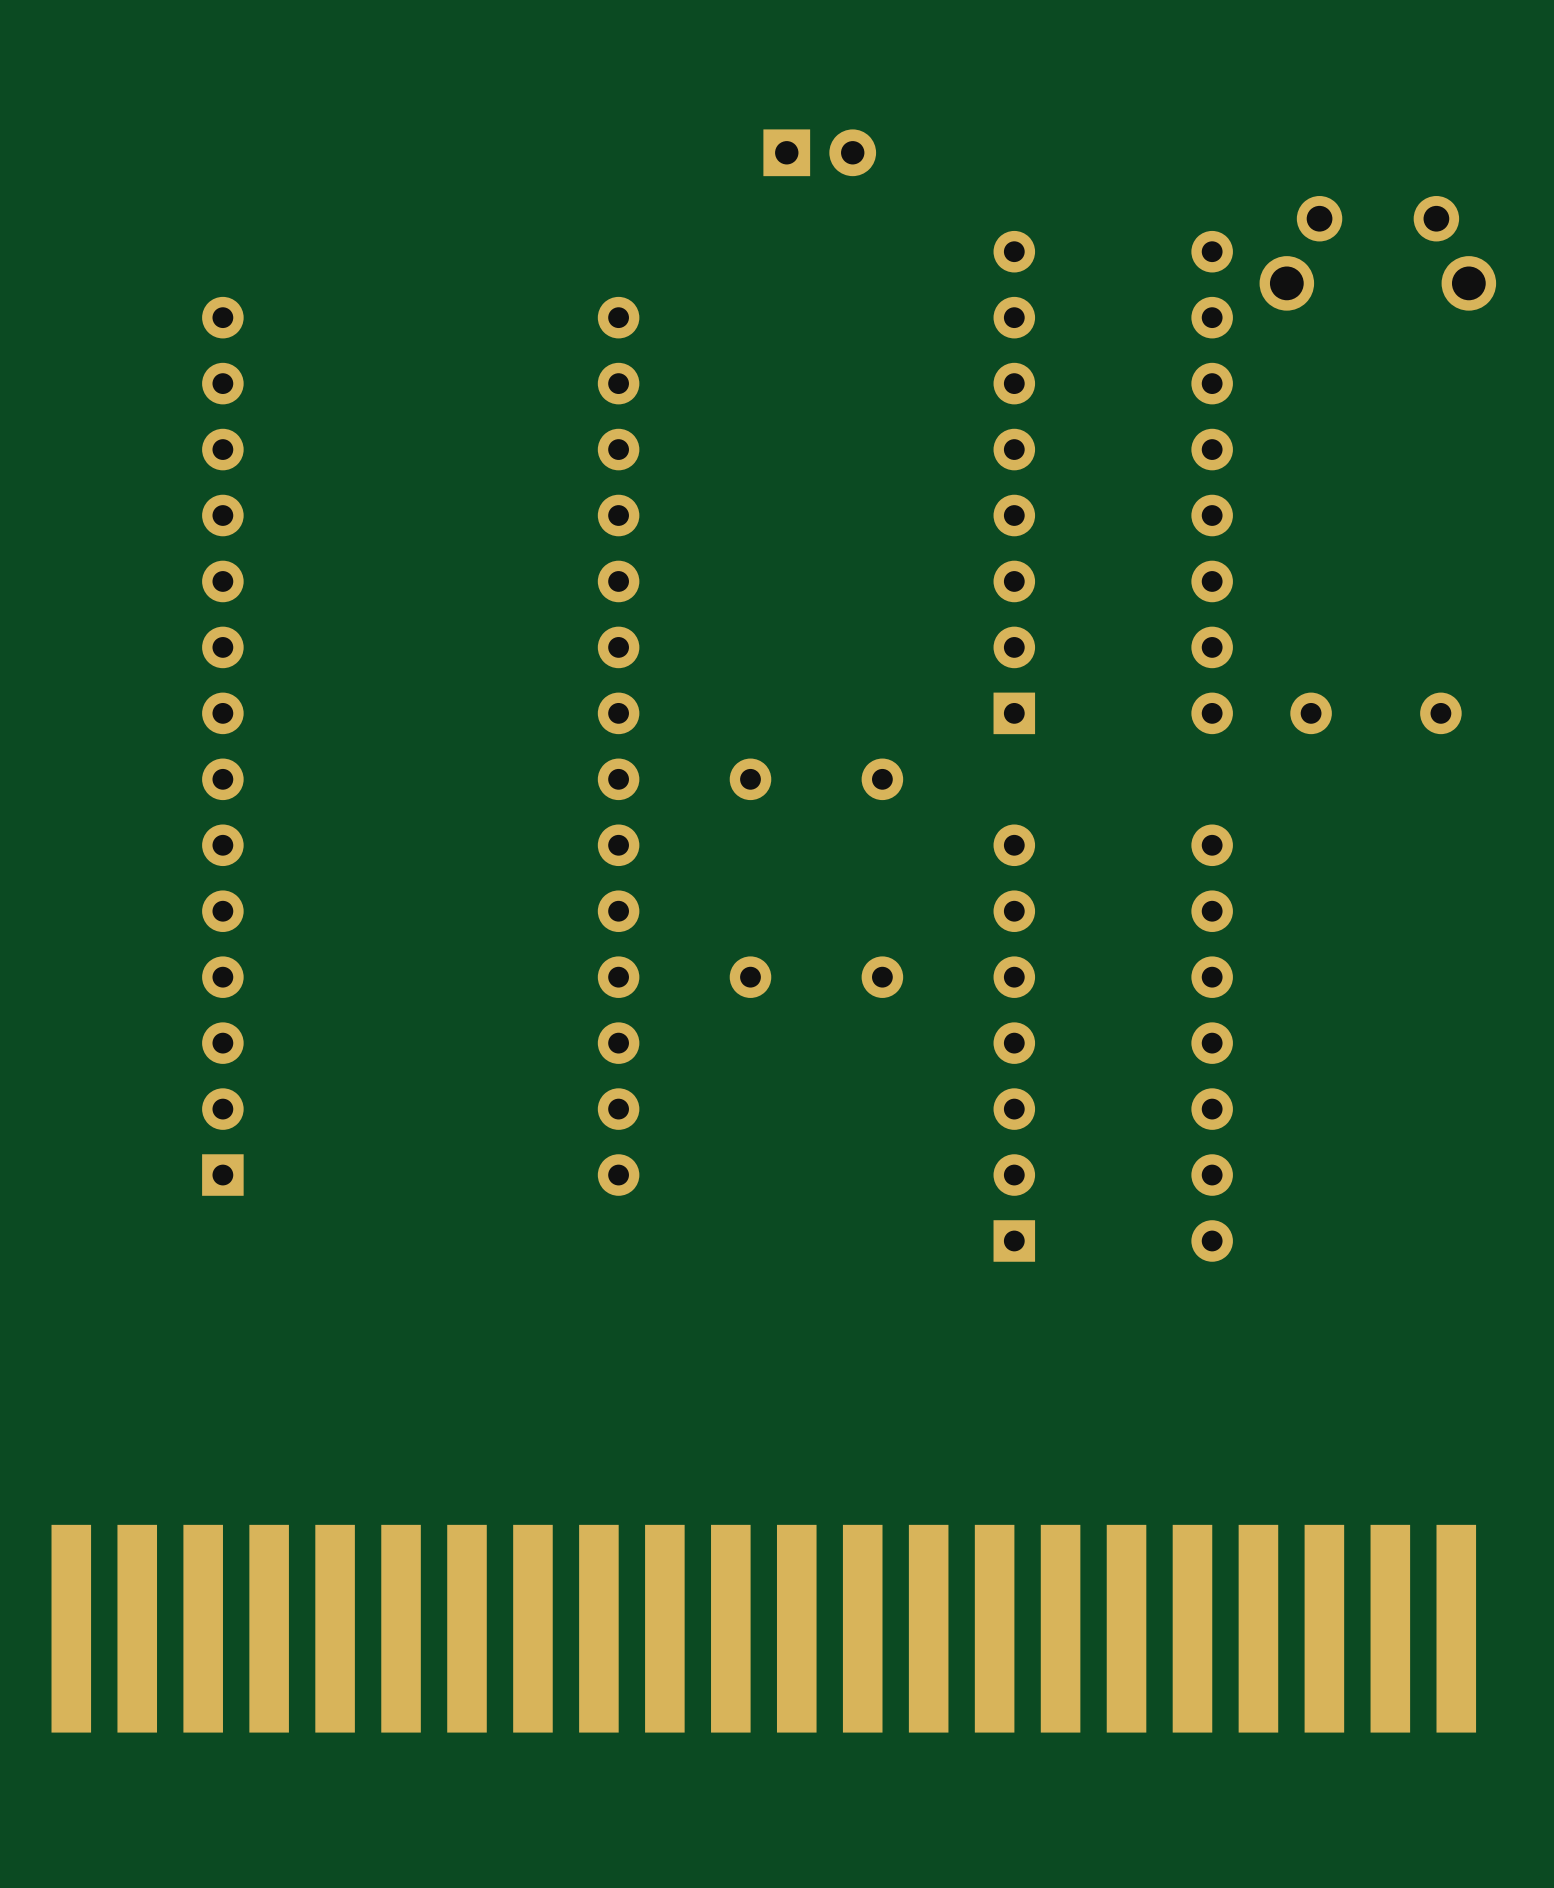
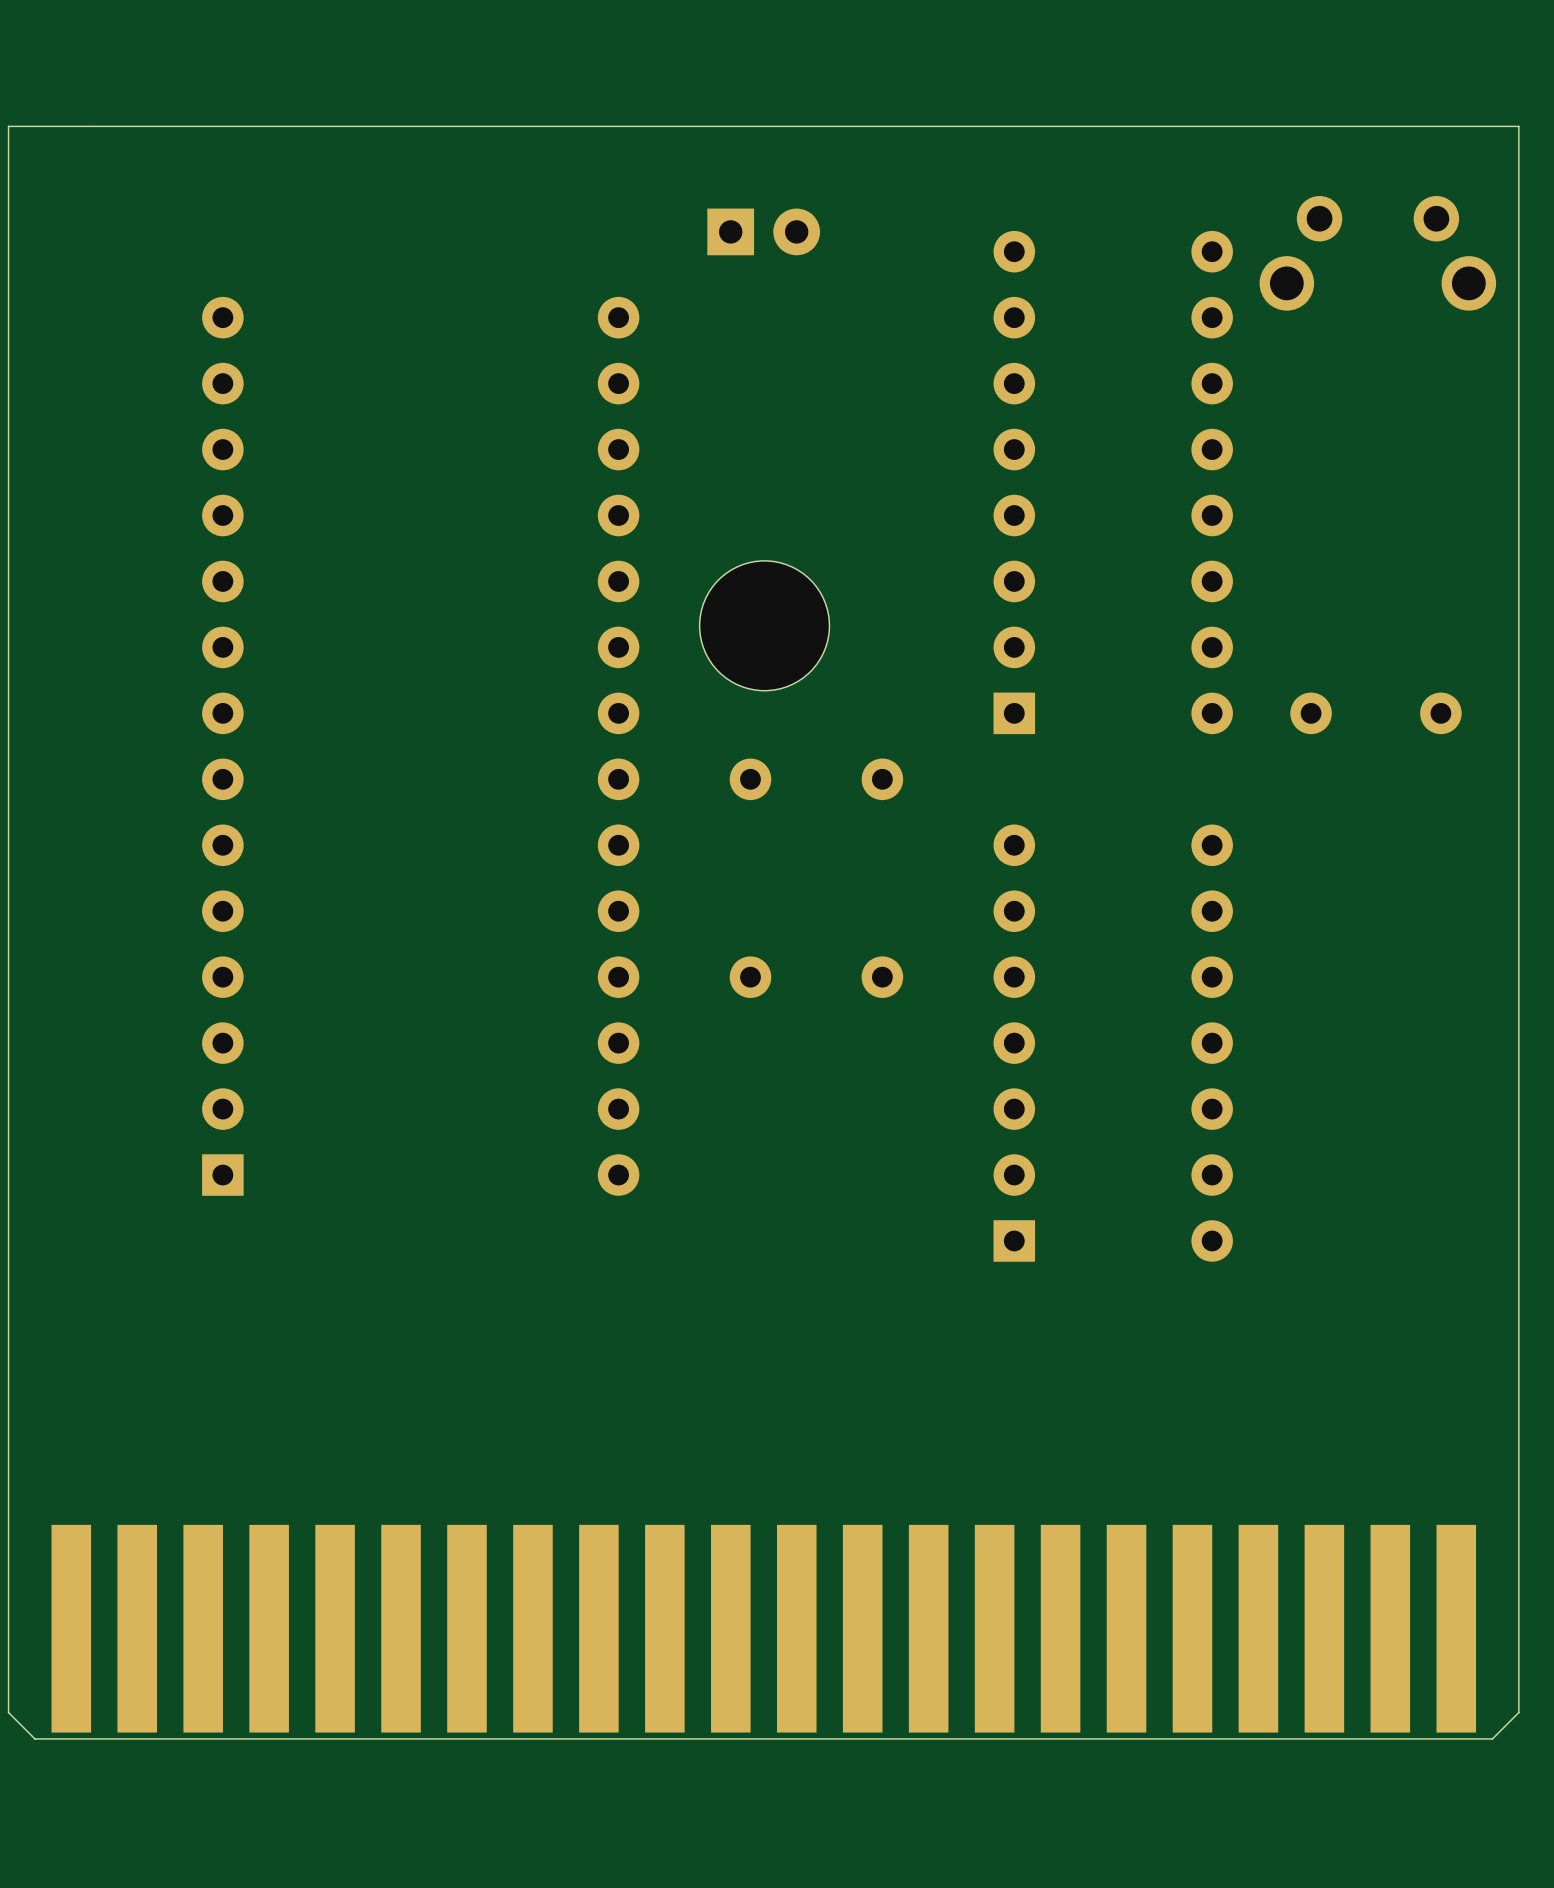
board edge: none -> (1518, 126) (8, 126) (8, 1712) (34, 1738) (1492, 1738) (1518, 1712) (1518, 126)
part position: (819, 152) -> (763, 231)
part: none -> (764, 625)

